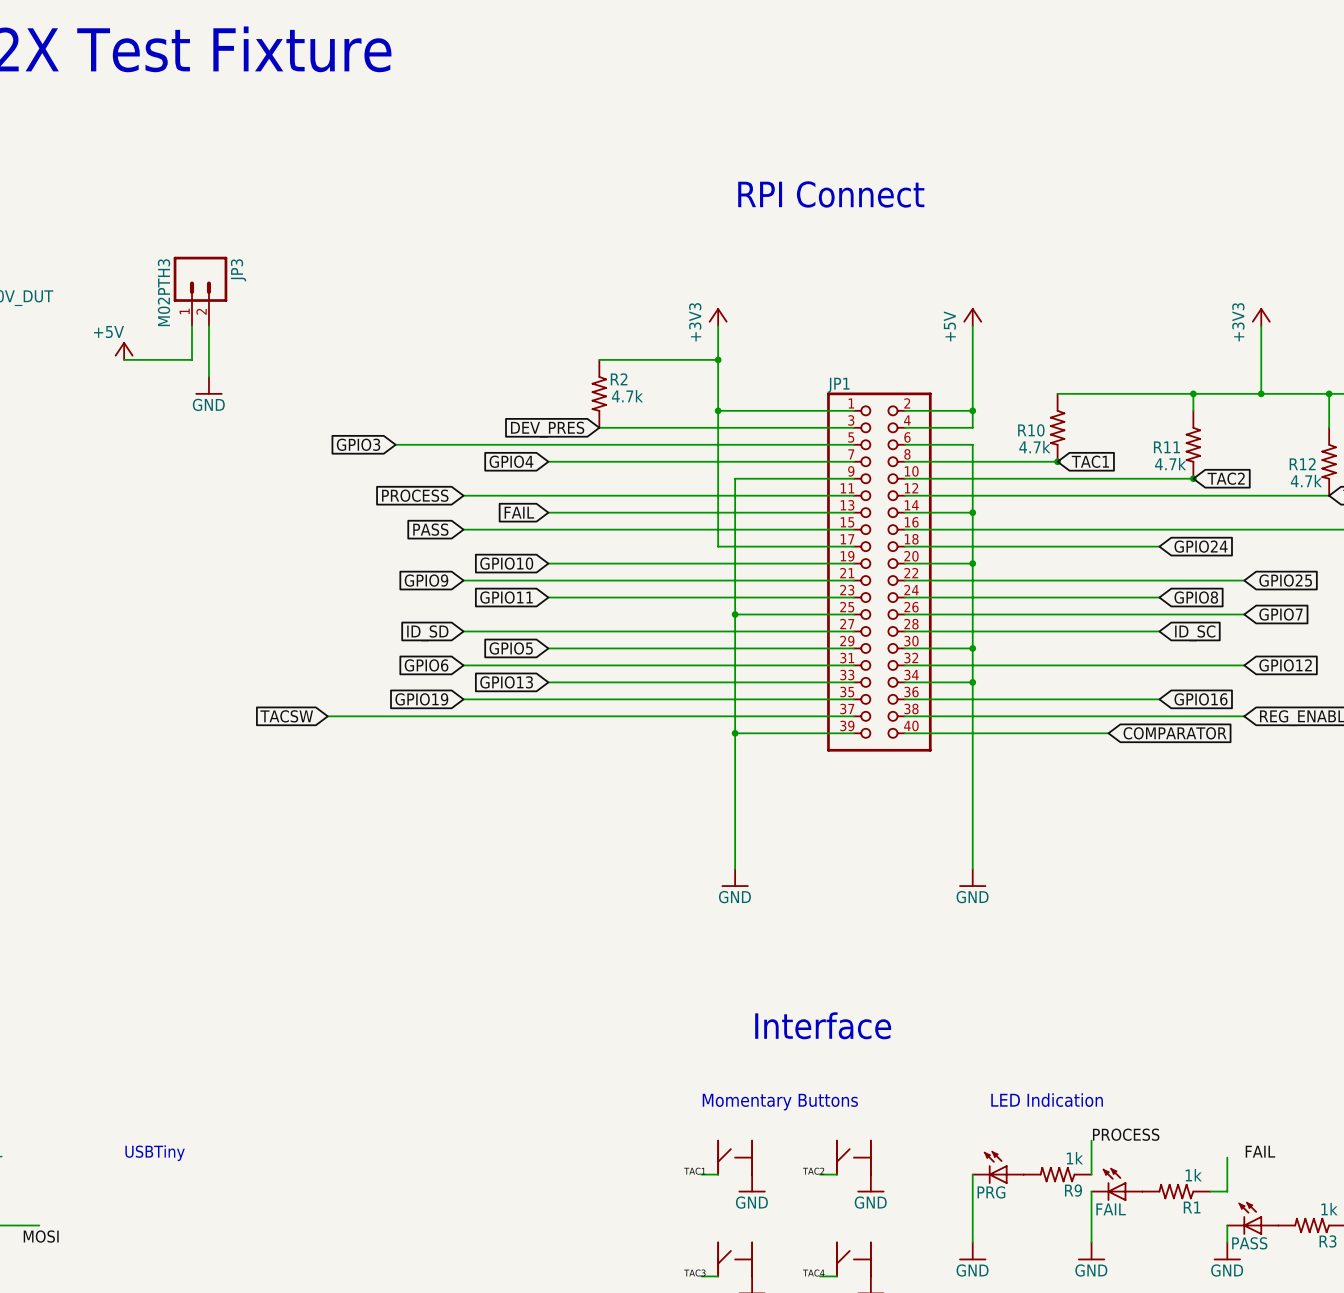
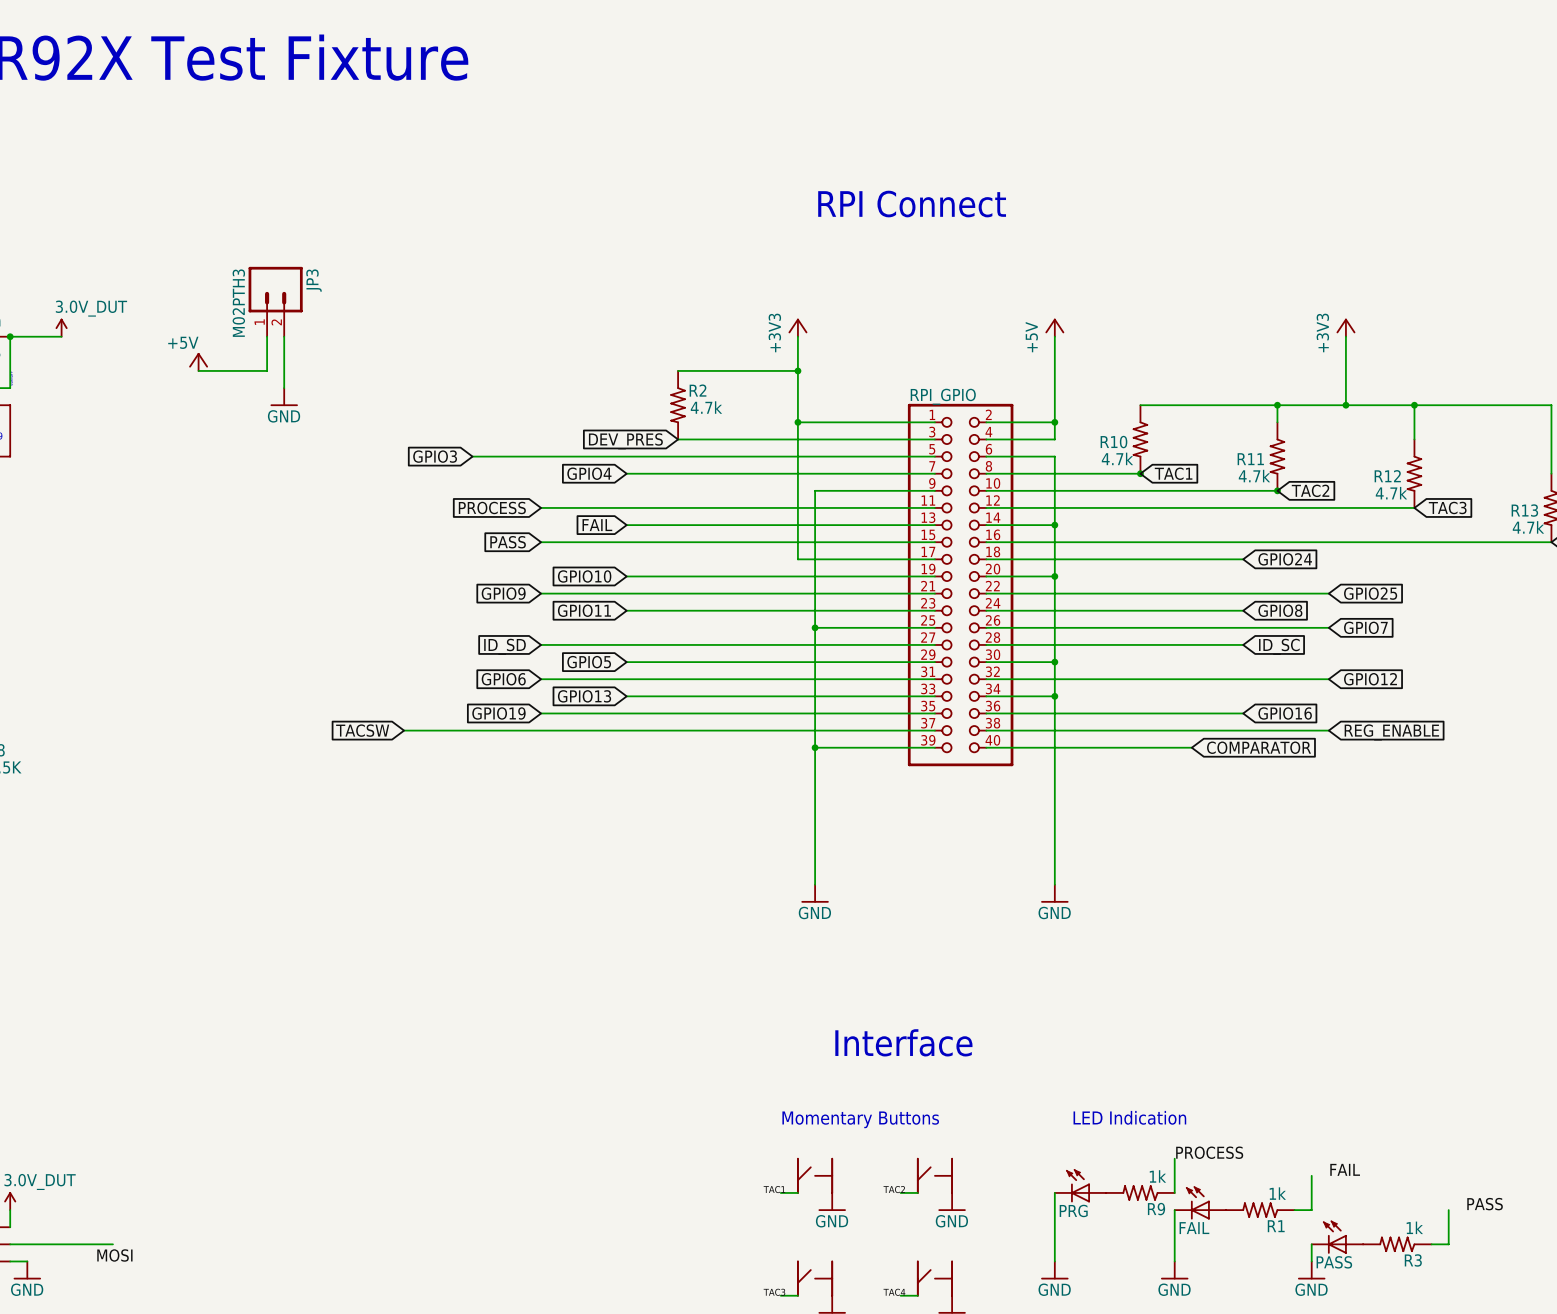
JP1 name: JP1 (838, 385) -> RPI_GPIO (943, 396)
text: USBTiny (155, 1153) -> none

